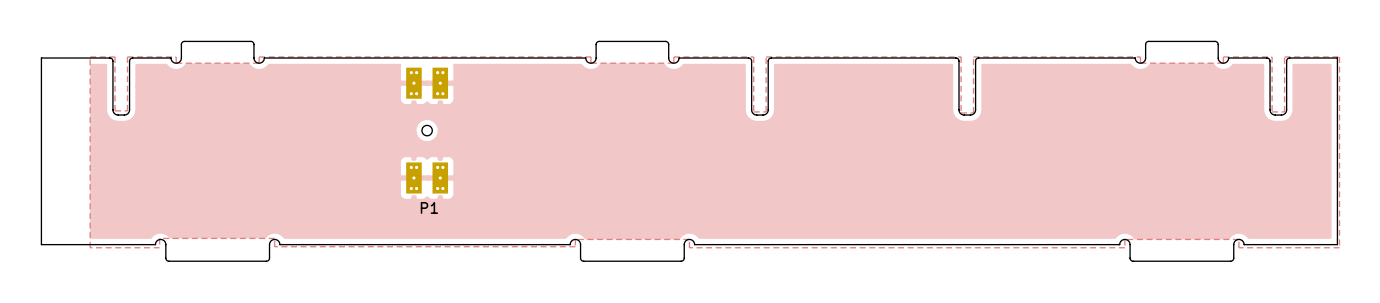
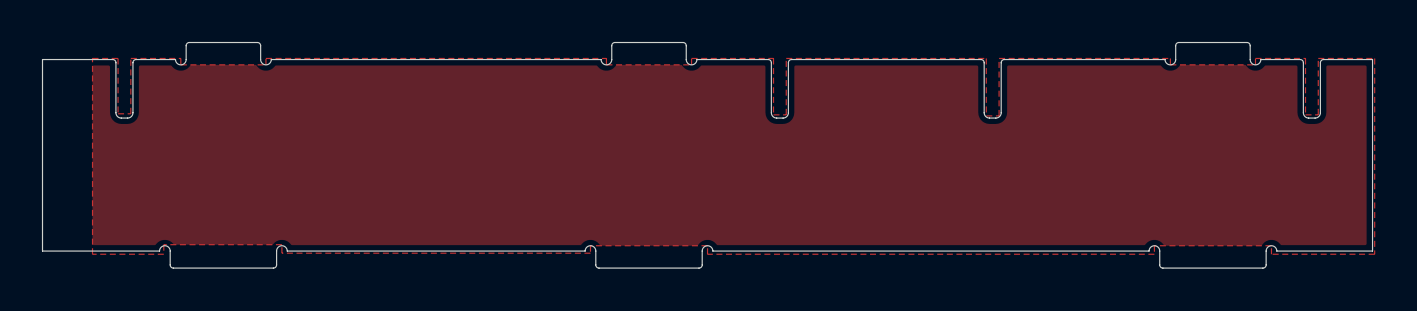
P1: (427, 130) -> none

